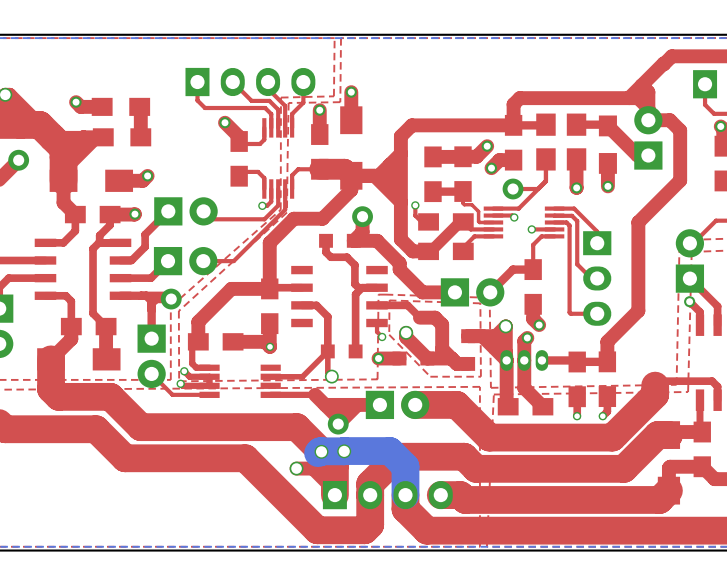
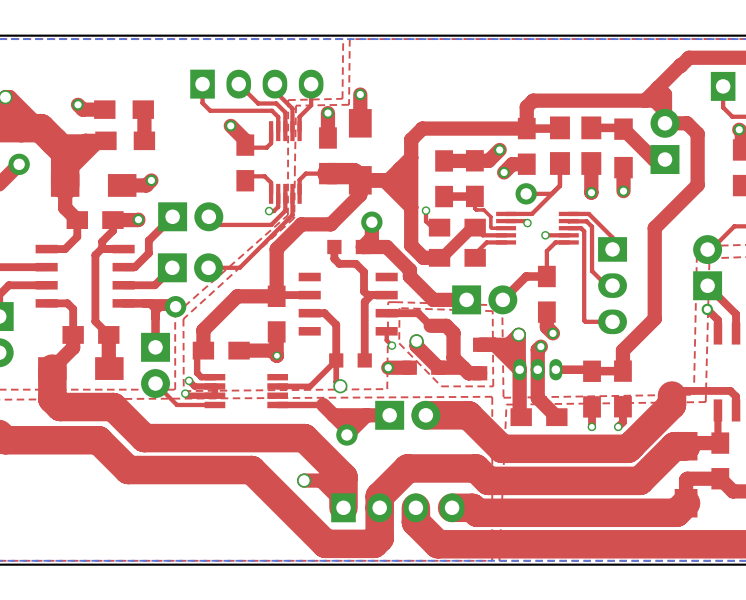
via: (321, 451) -> none
via: (344, 451) -> none
bottom track: (318, 453) (319, 451) (389, 451) (405, 466) (405, 495) -> none

